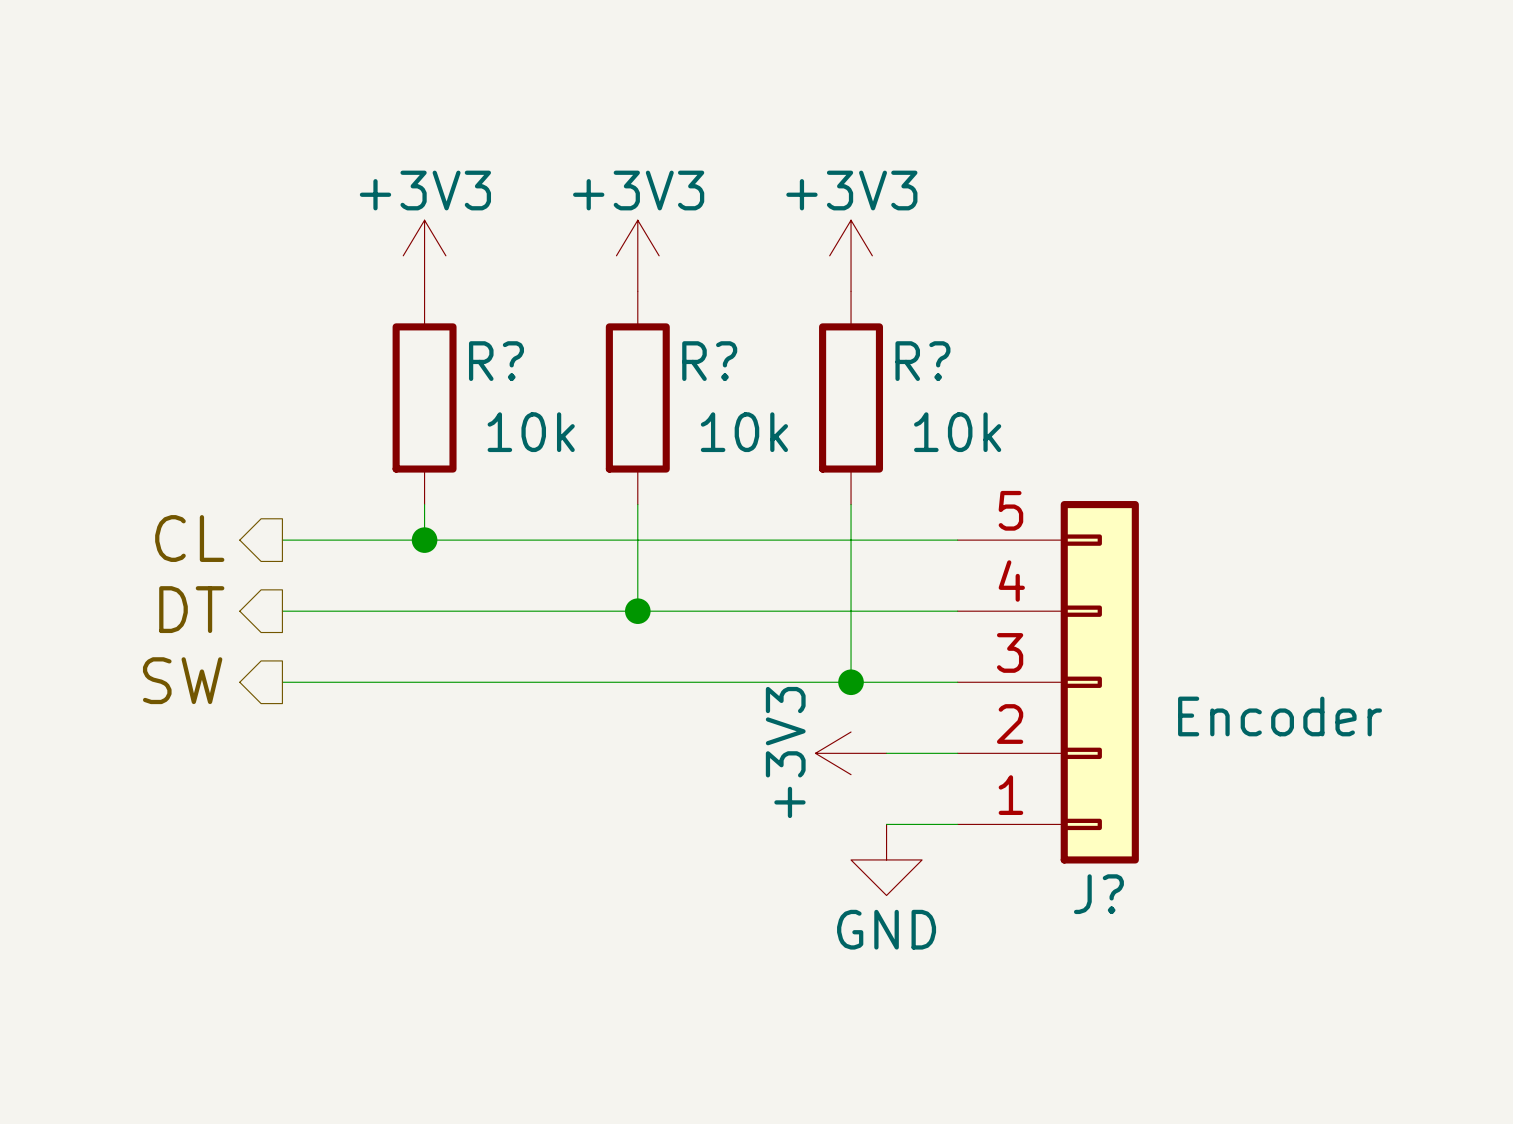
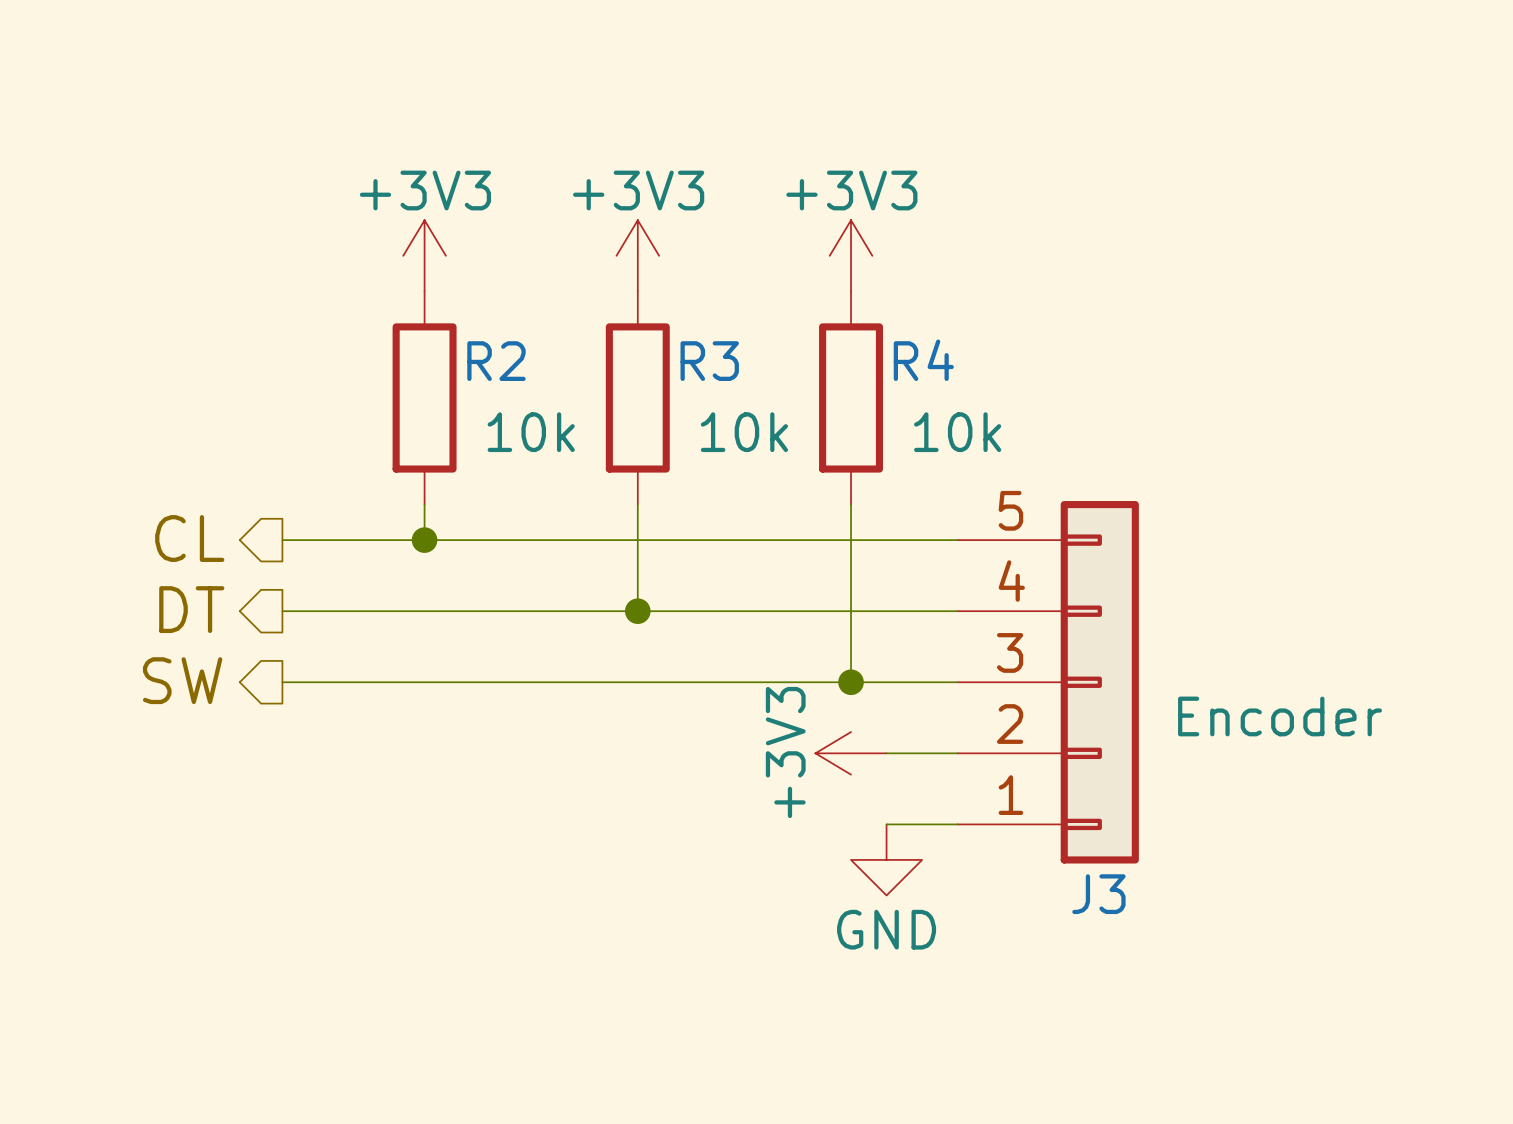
R? name: R? (496, 361) -> R2 (496, 361)
R? name: R? (709, 361) -> R3 (709, 361)
R? name: R? (922, 361) -> R4 (923, 360)
J? name: J? (1098, 894) -> J3 (1098, 894)

